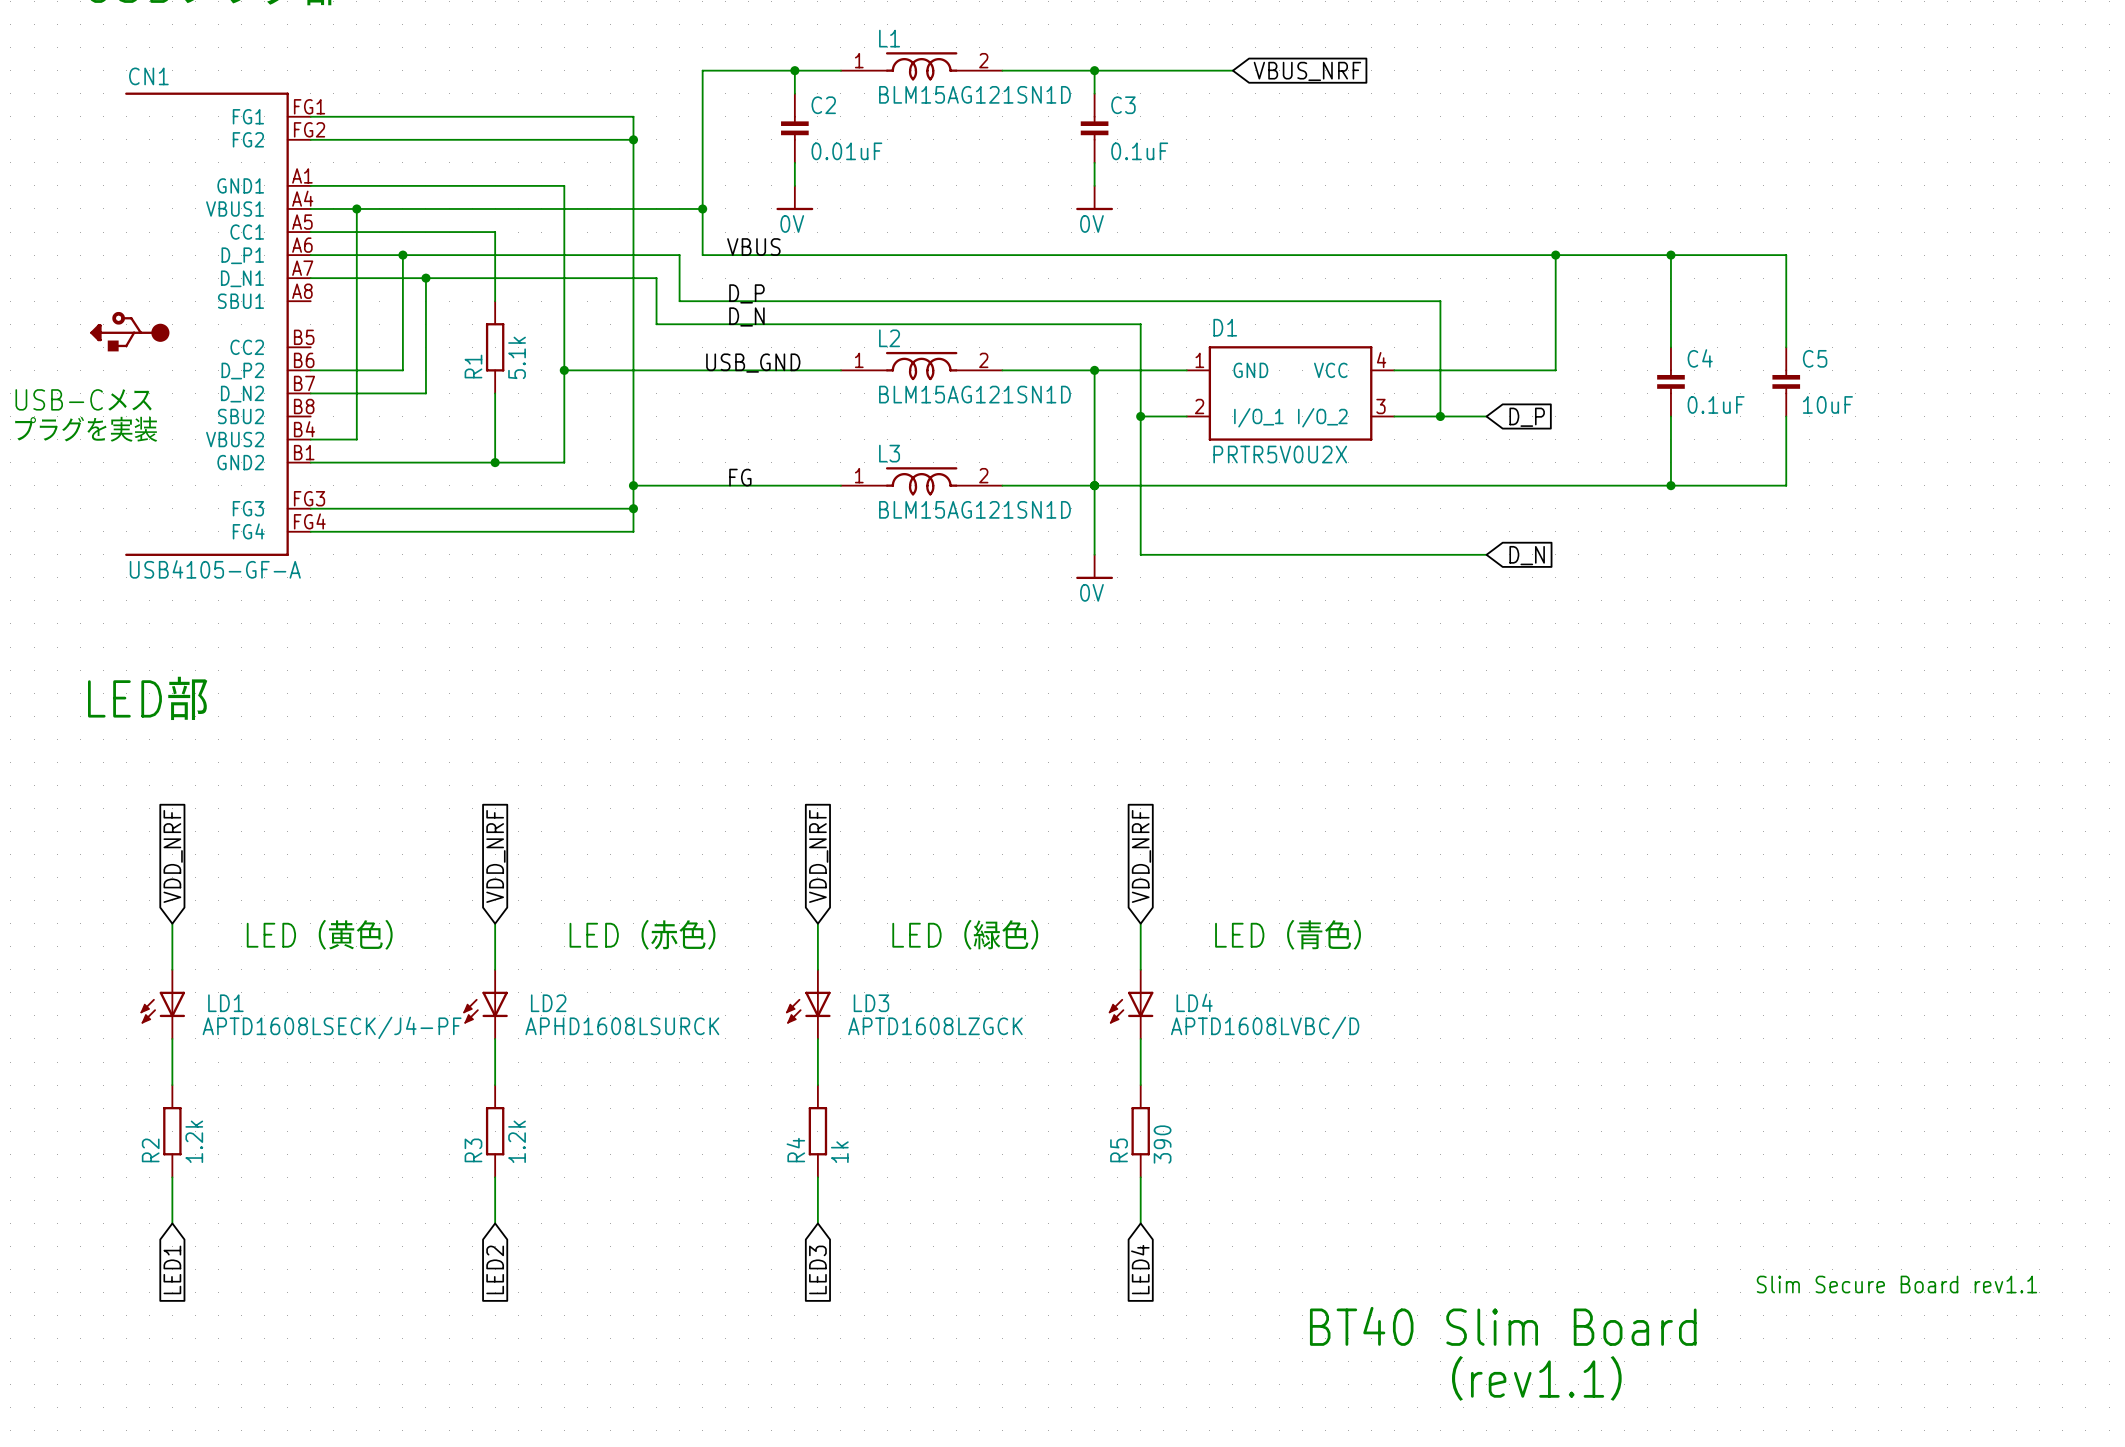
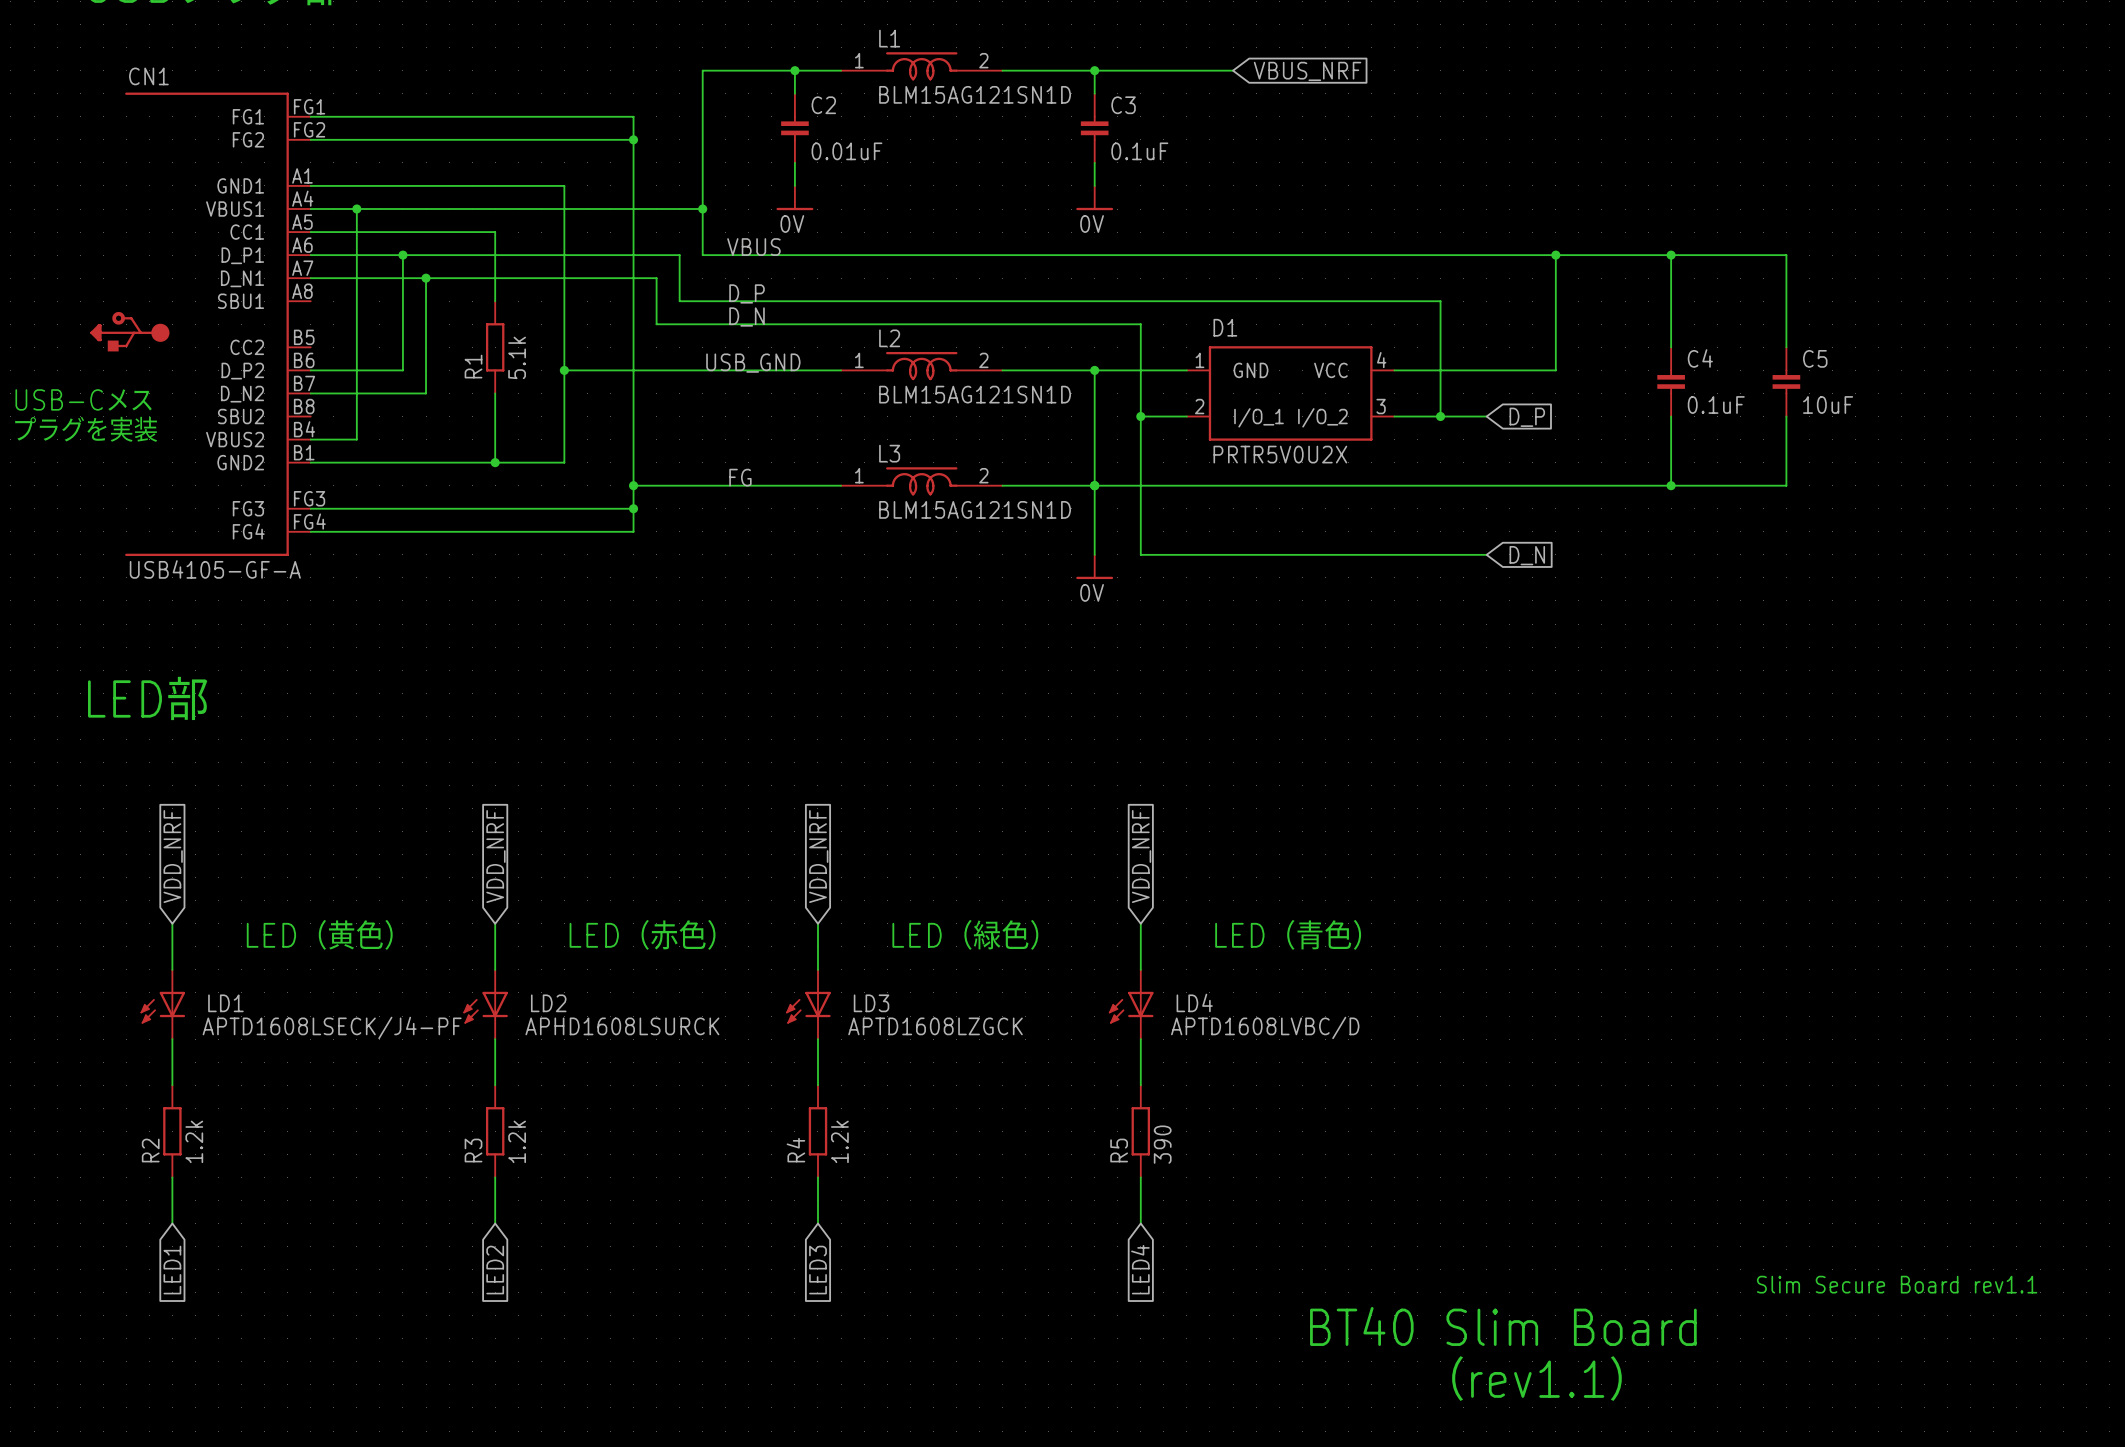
R4 value: 1k (839, 1152) -> 1.2k (839, 1141)

